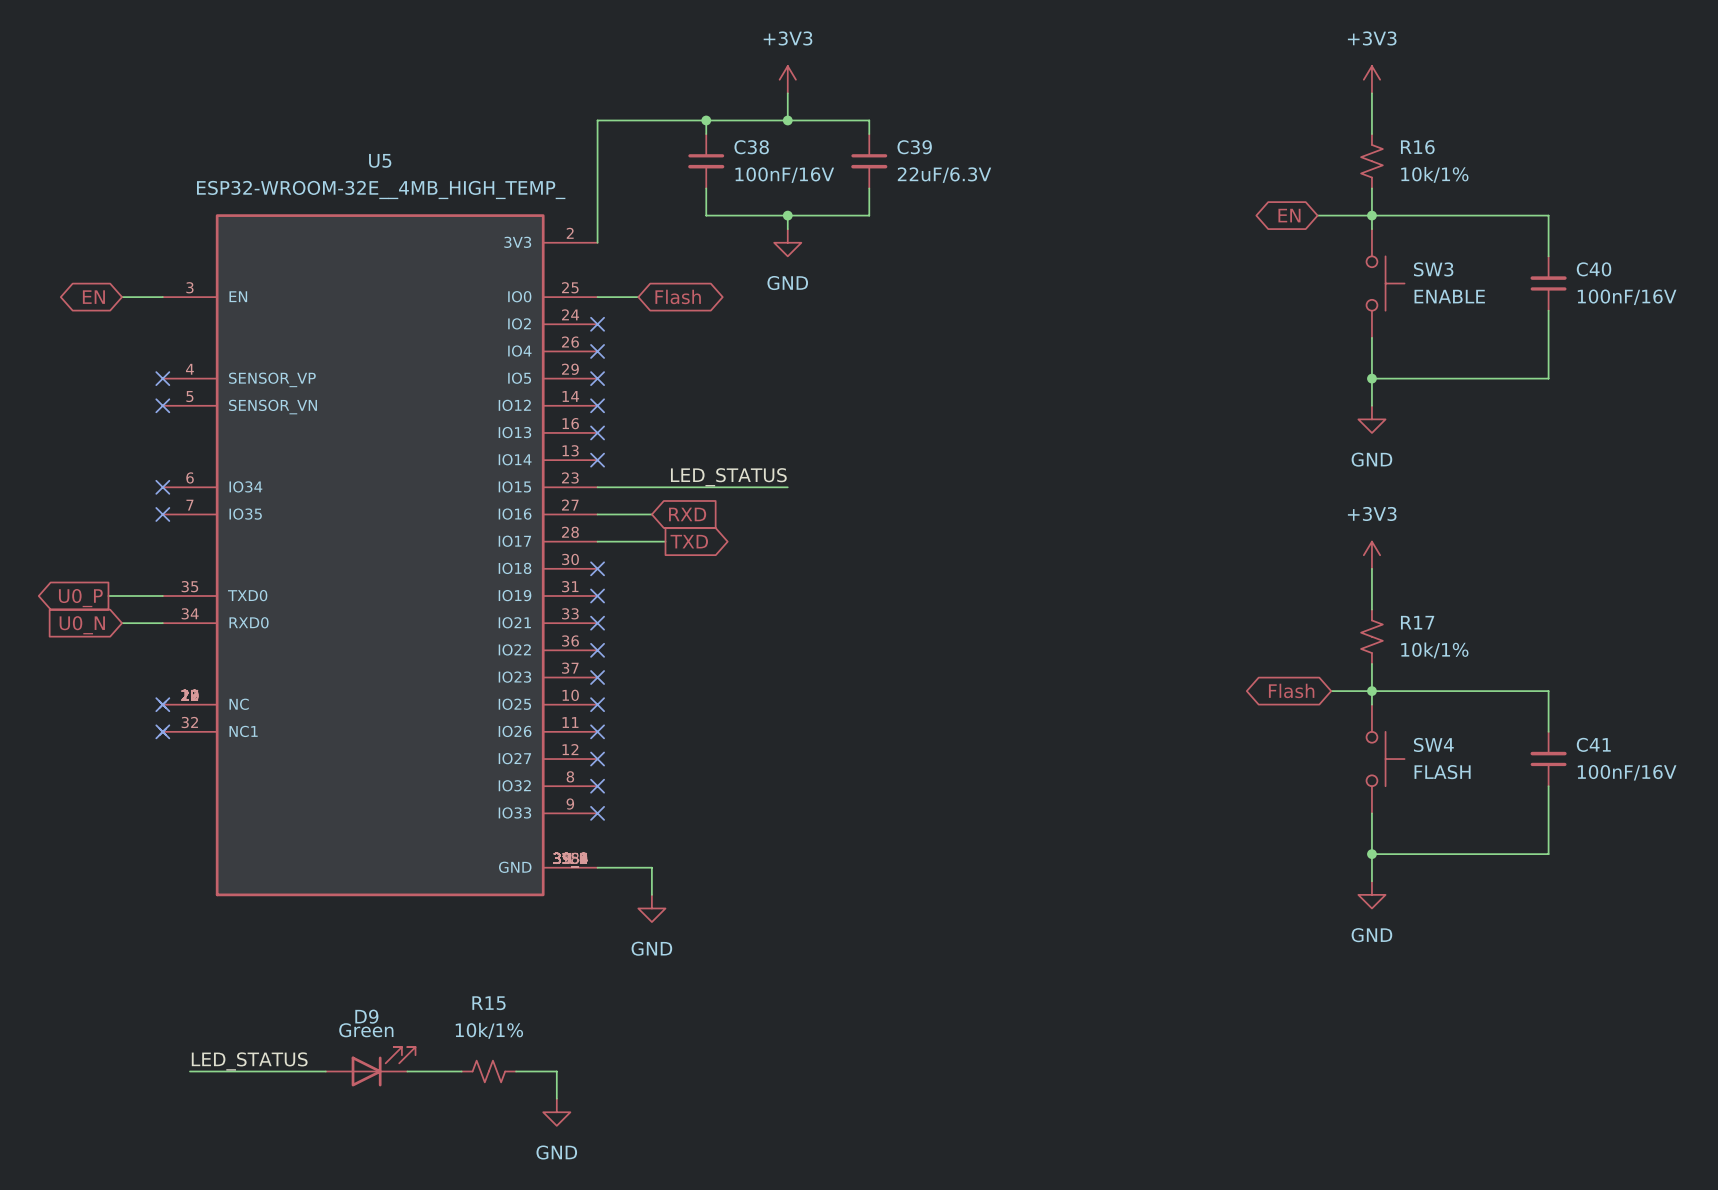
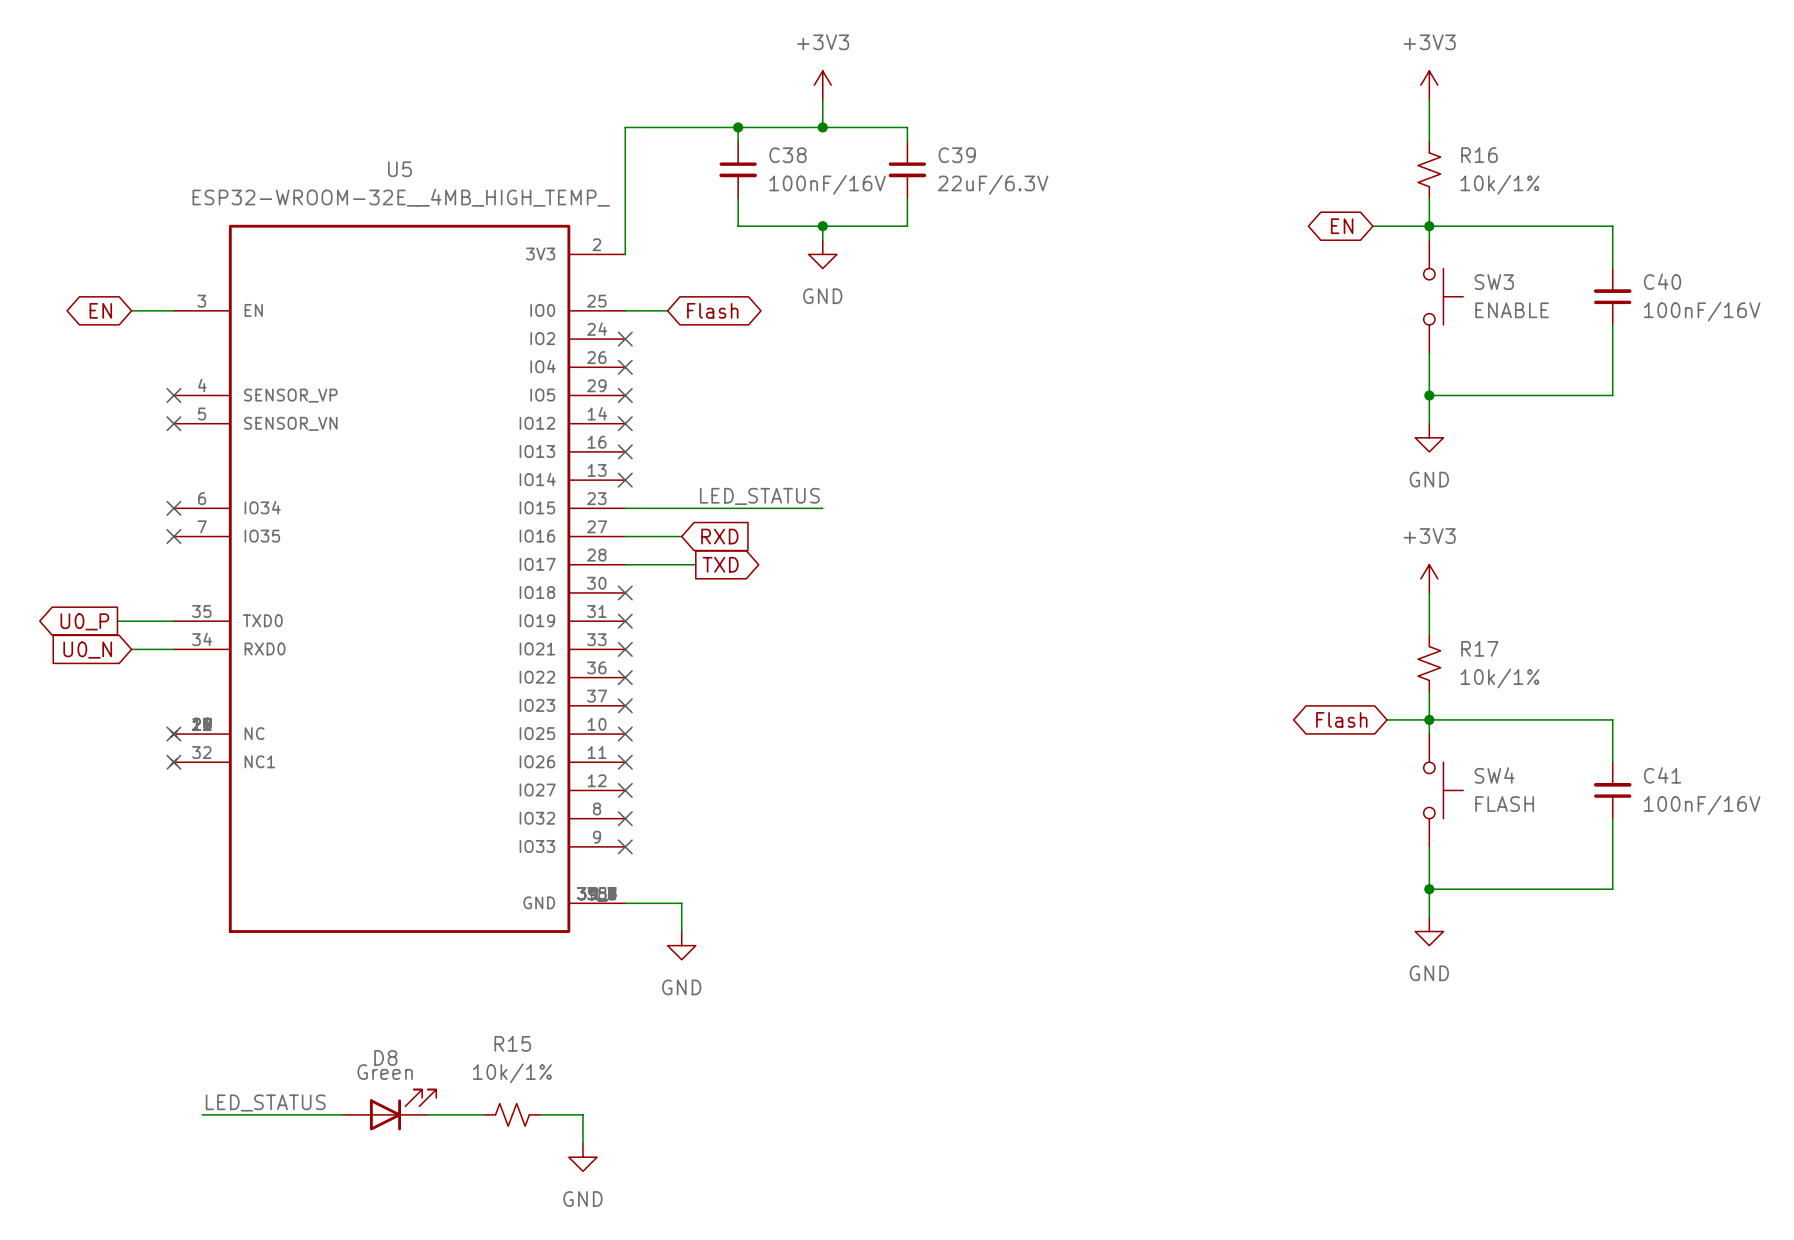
D9 name: D9 (366, 1016) -> D8 (385, 1057)

